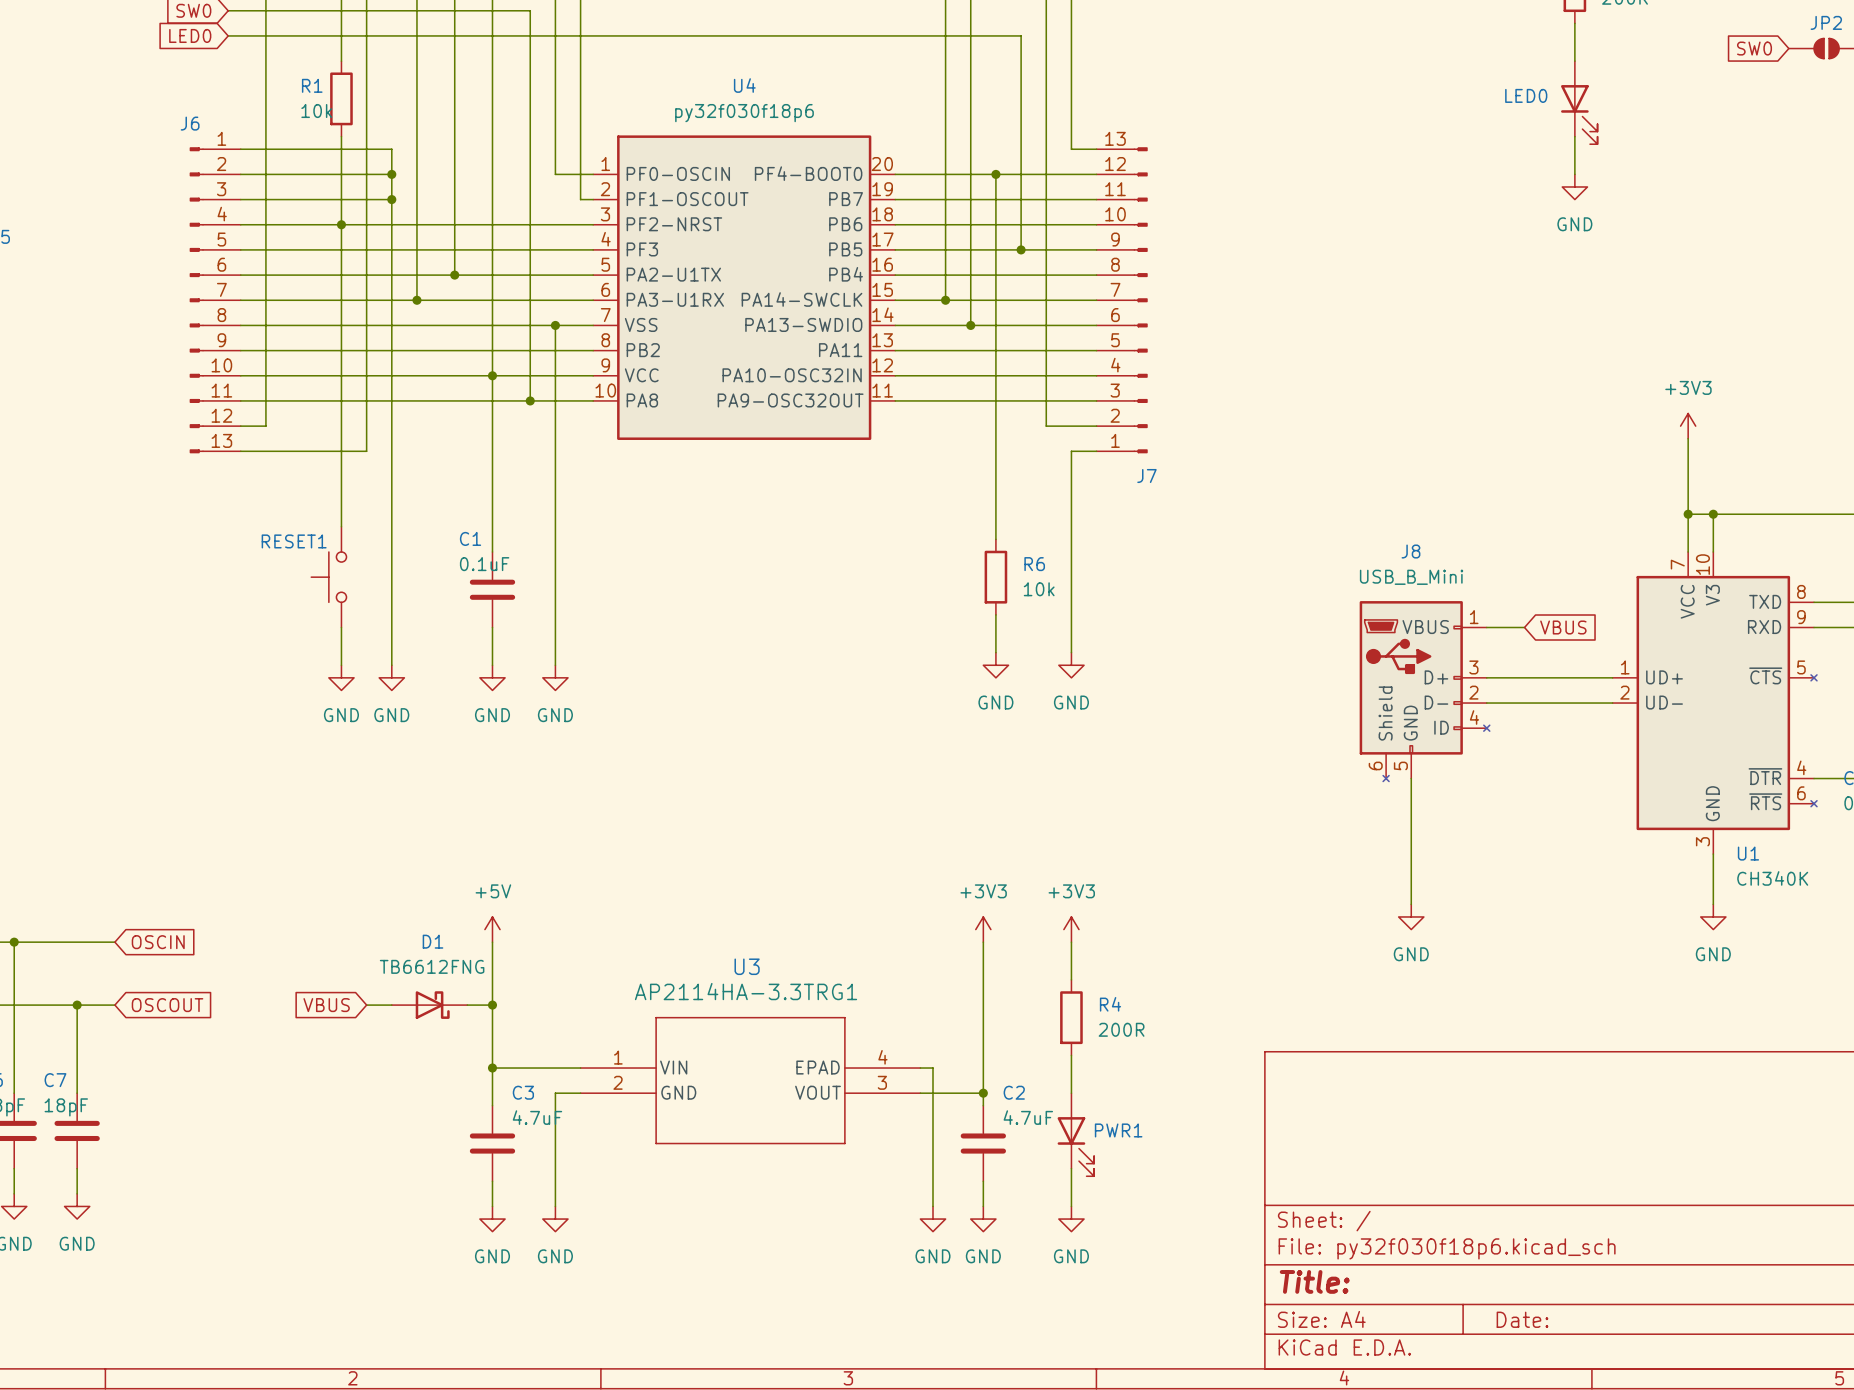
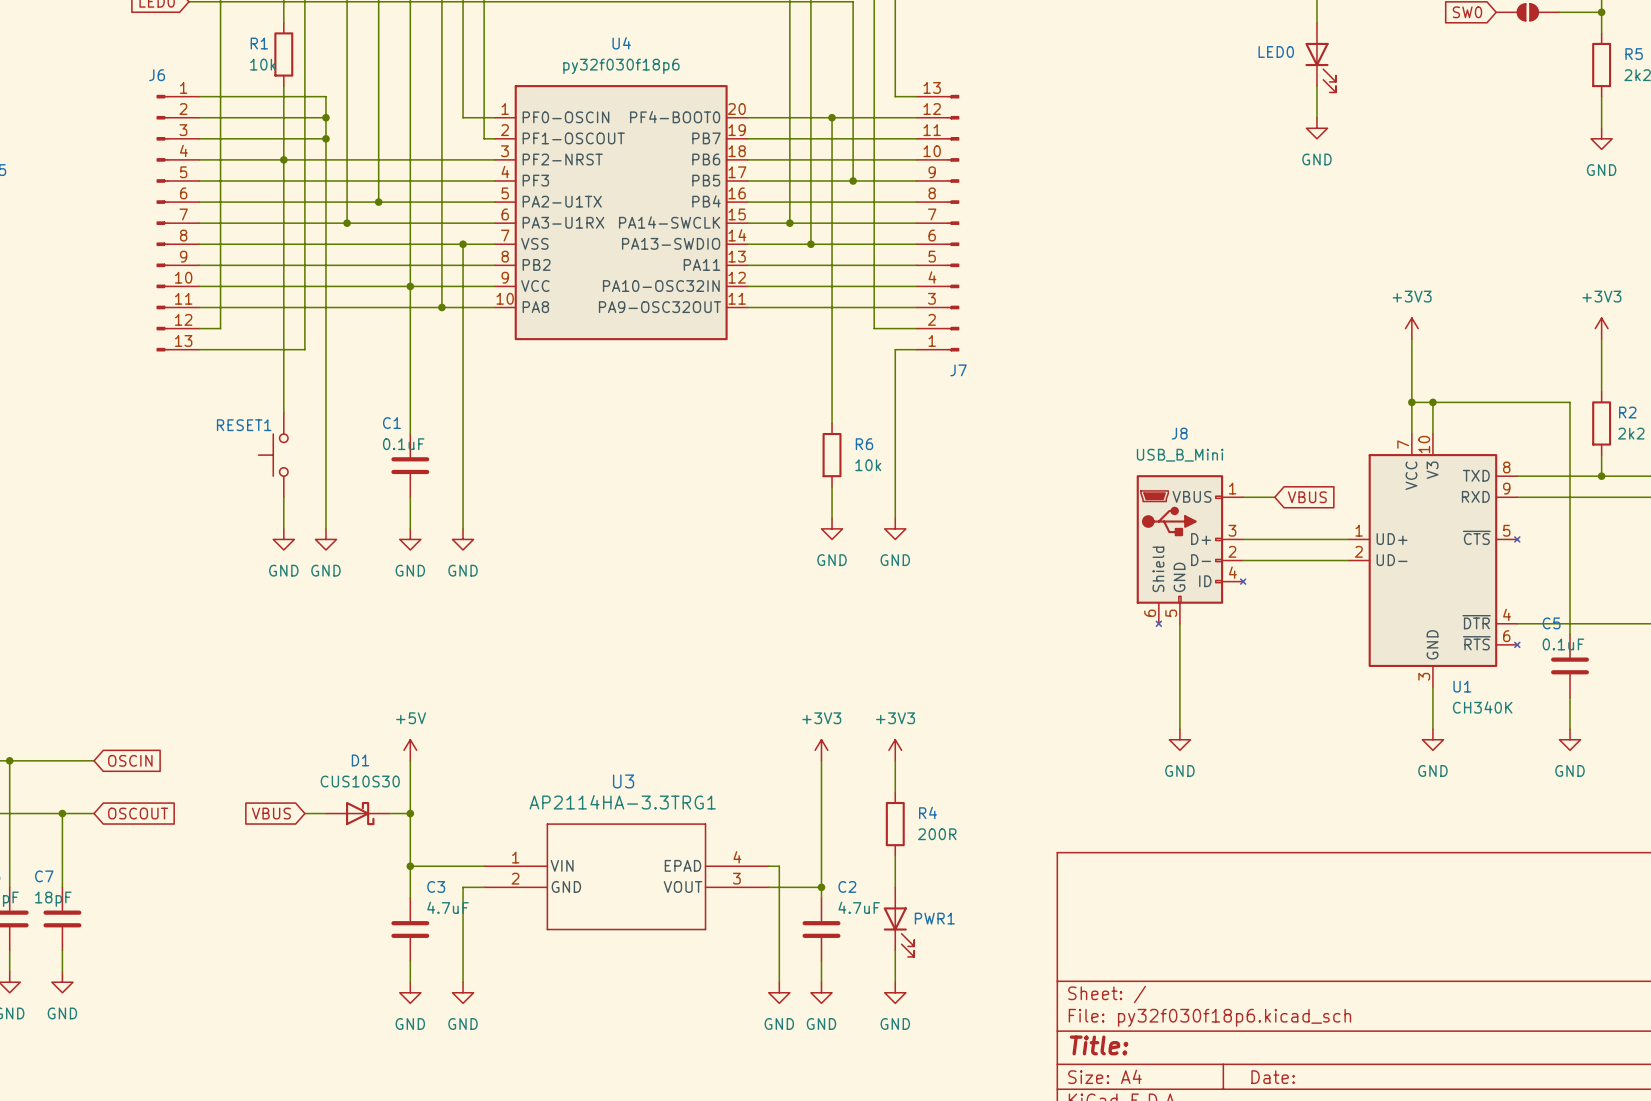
D1 value: TB6612FNG (432, 966) -> CUS10S30 (360, 781)

